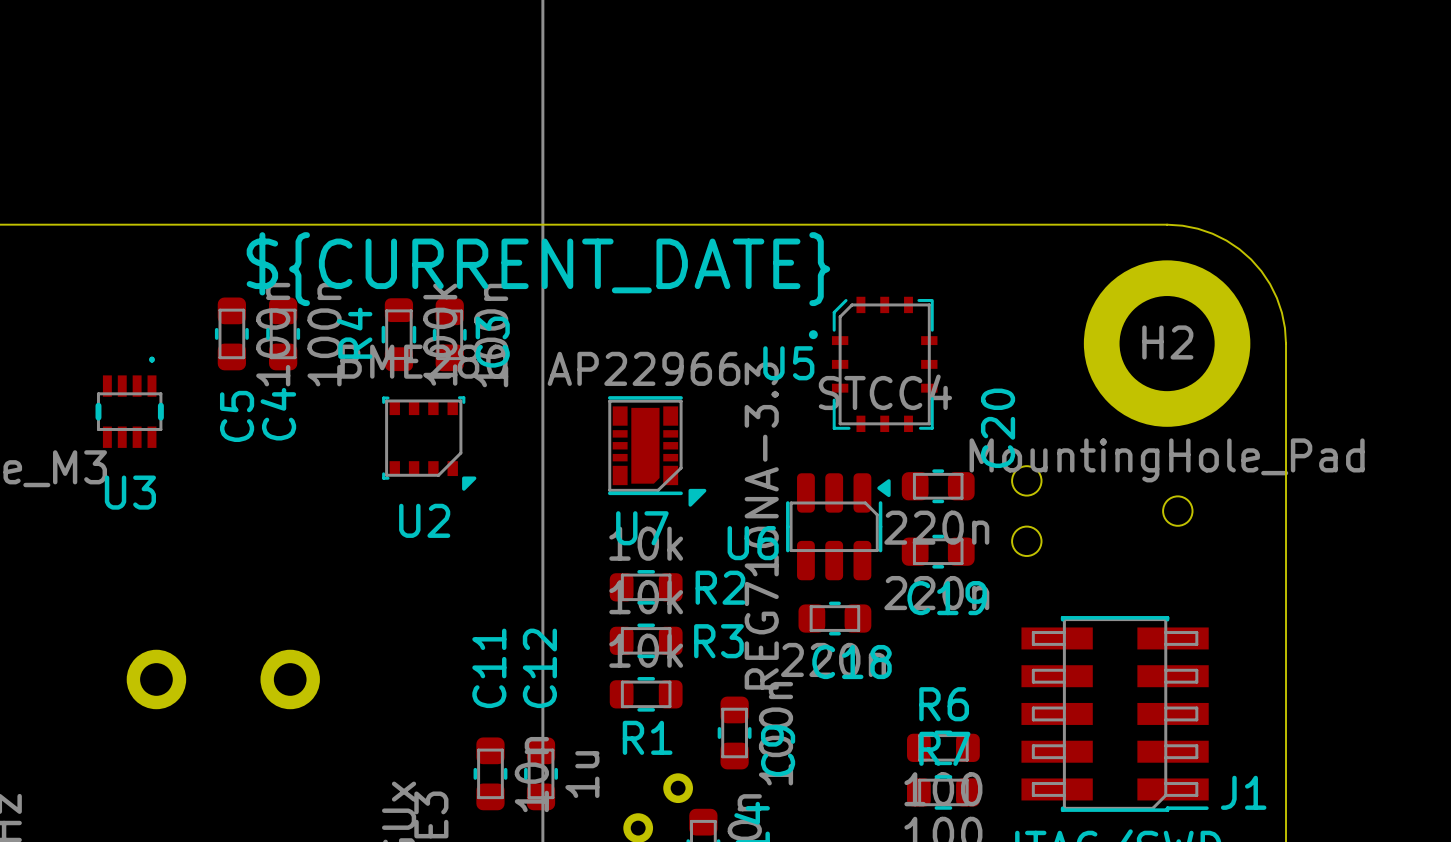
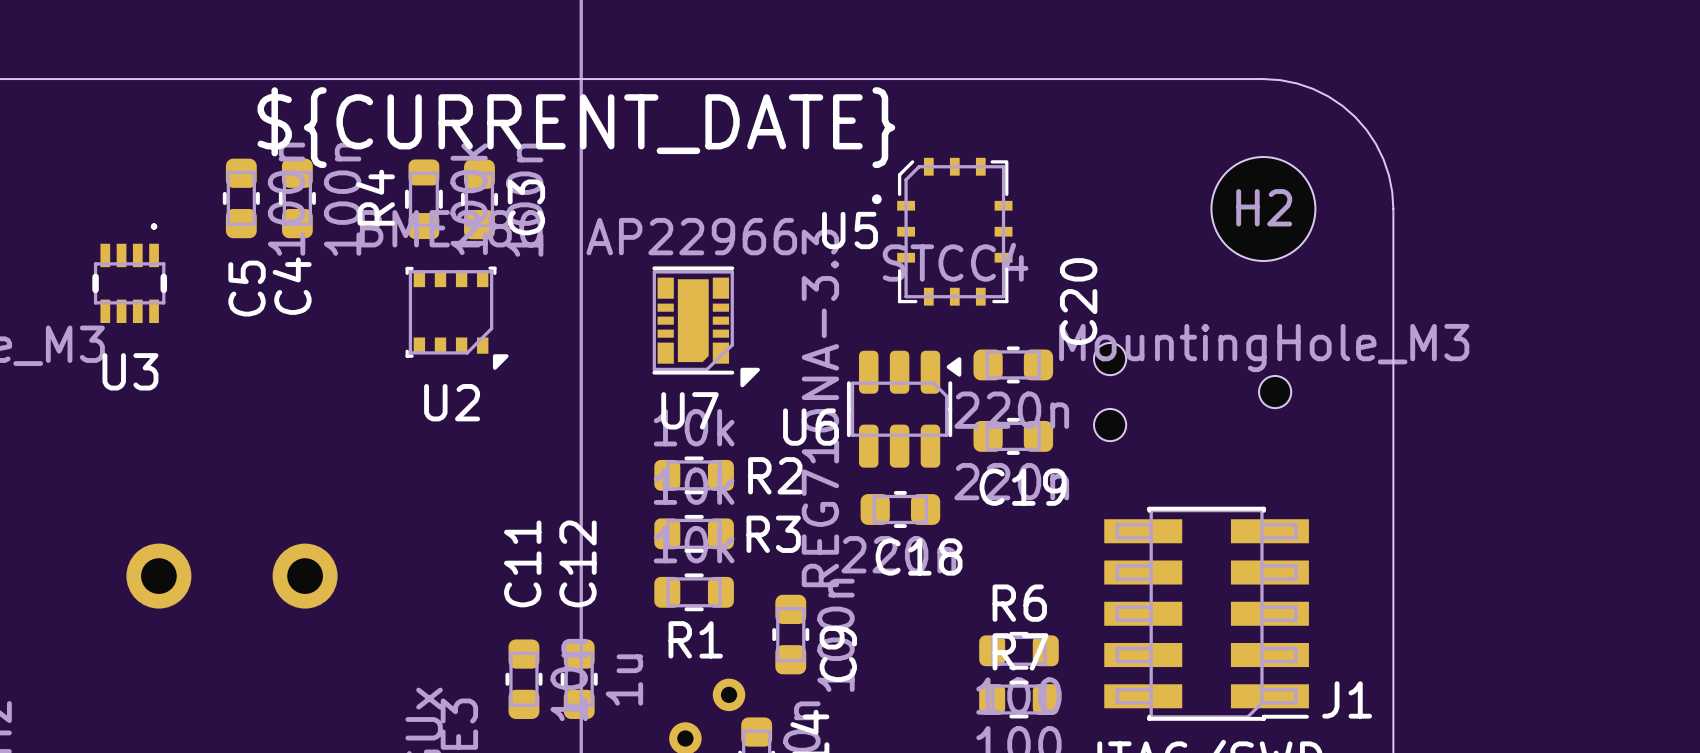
H2 footprint: [1083, 260, 1251, 427] -> [1211, 157, 1316, 261]
H2 value: MountingHole_Pad (1167, 460) -> MountingHole_M3 (1264, 348)

